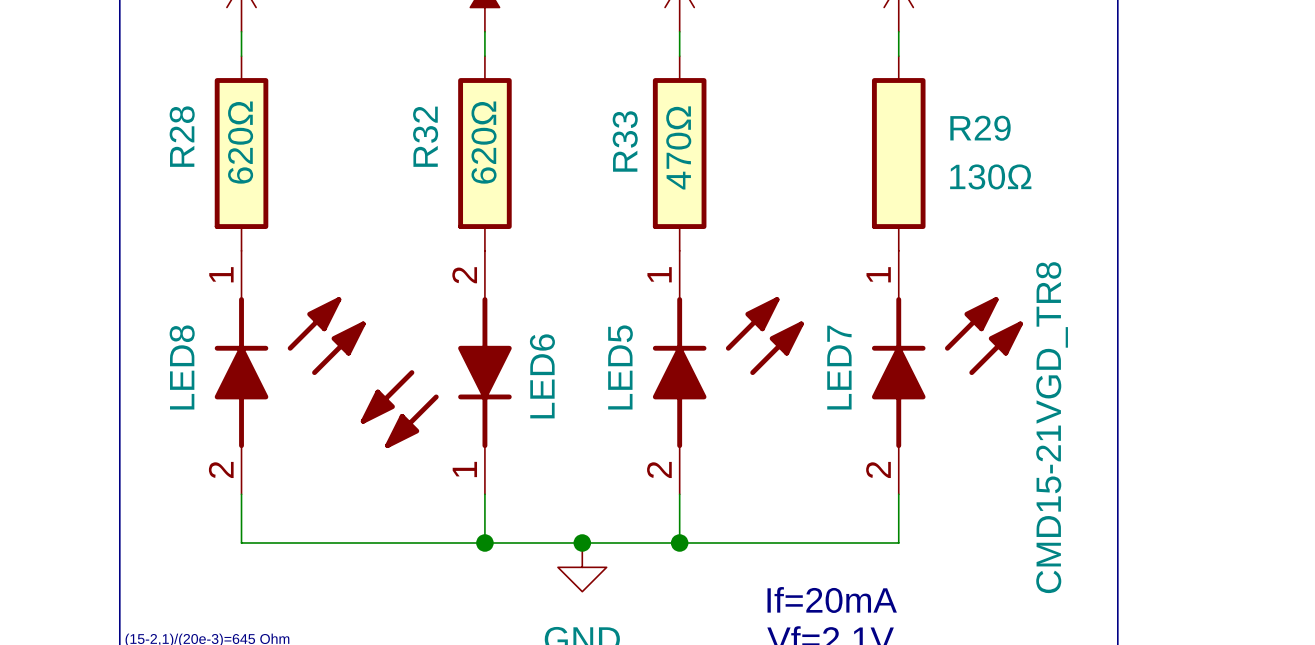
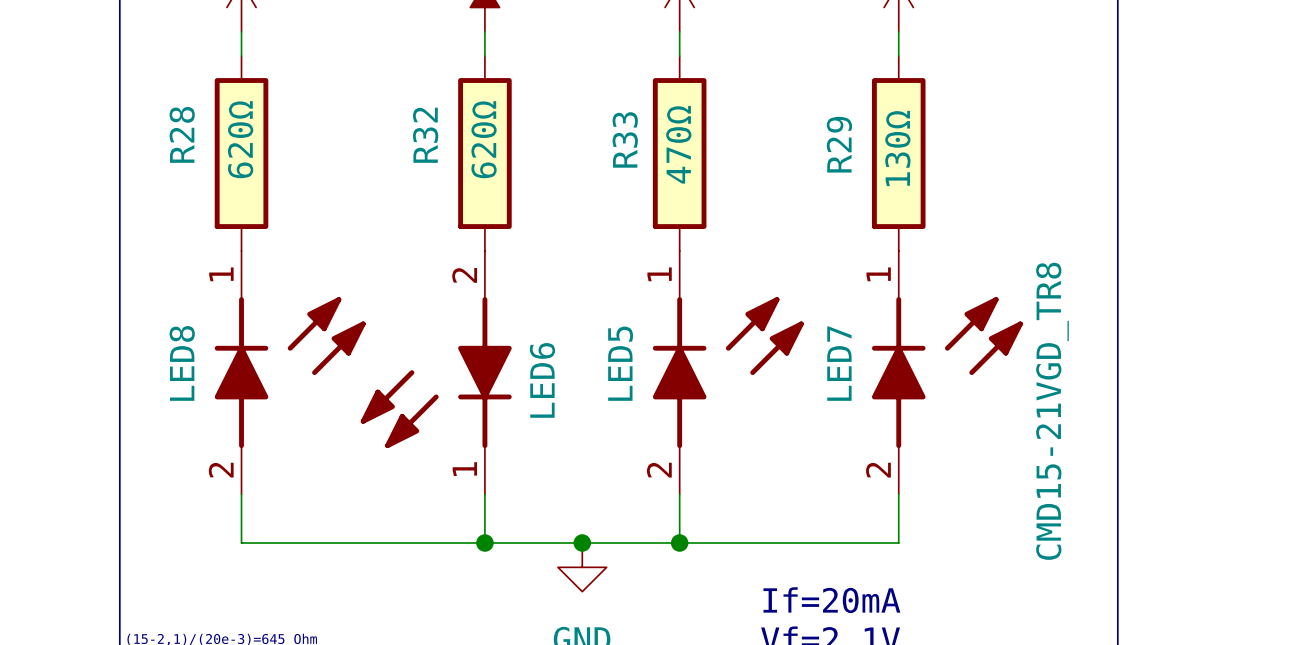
R29 name rotation: 0° (980, 128) -> 90° counterclockwise (839, 144)
R29 name position: R29 (980, 128) -> R29 (839, 144)
R29 value rotation: 0° (990, 176) -> 90° counterclockwise (897, 148)

